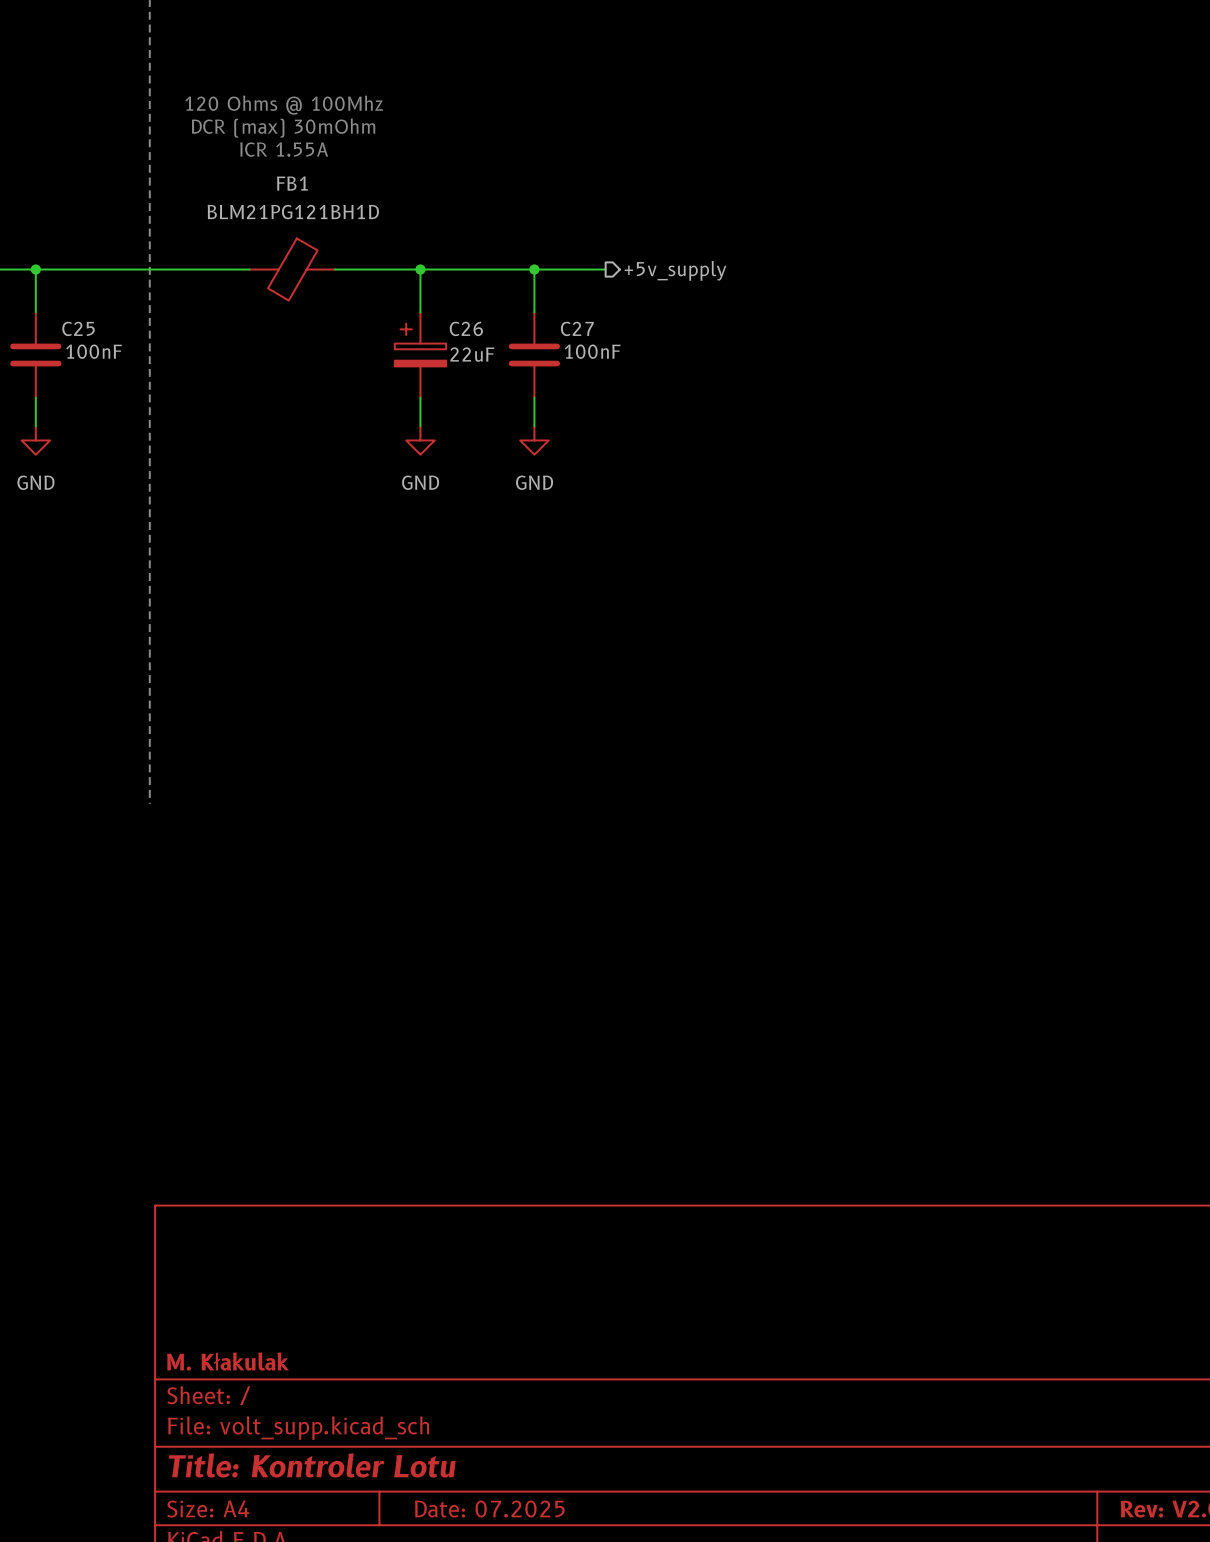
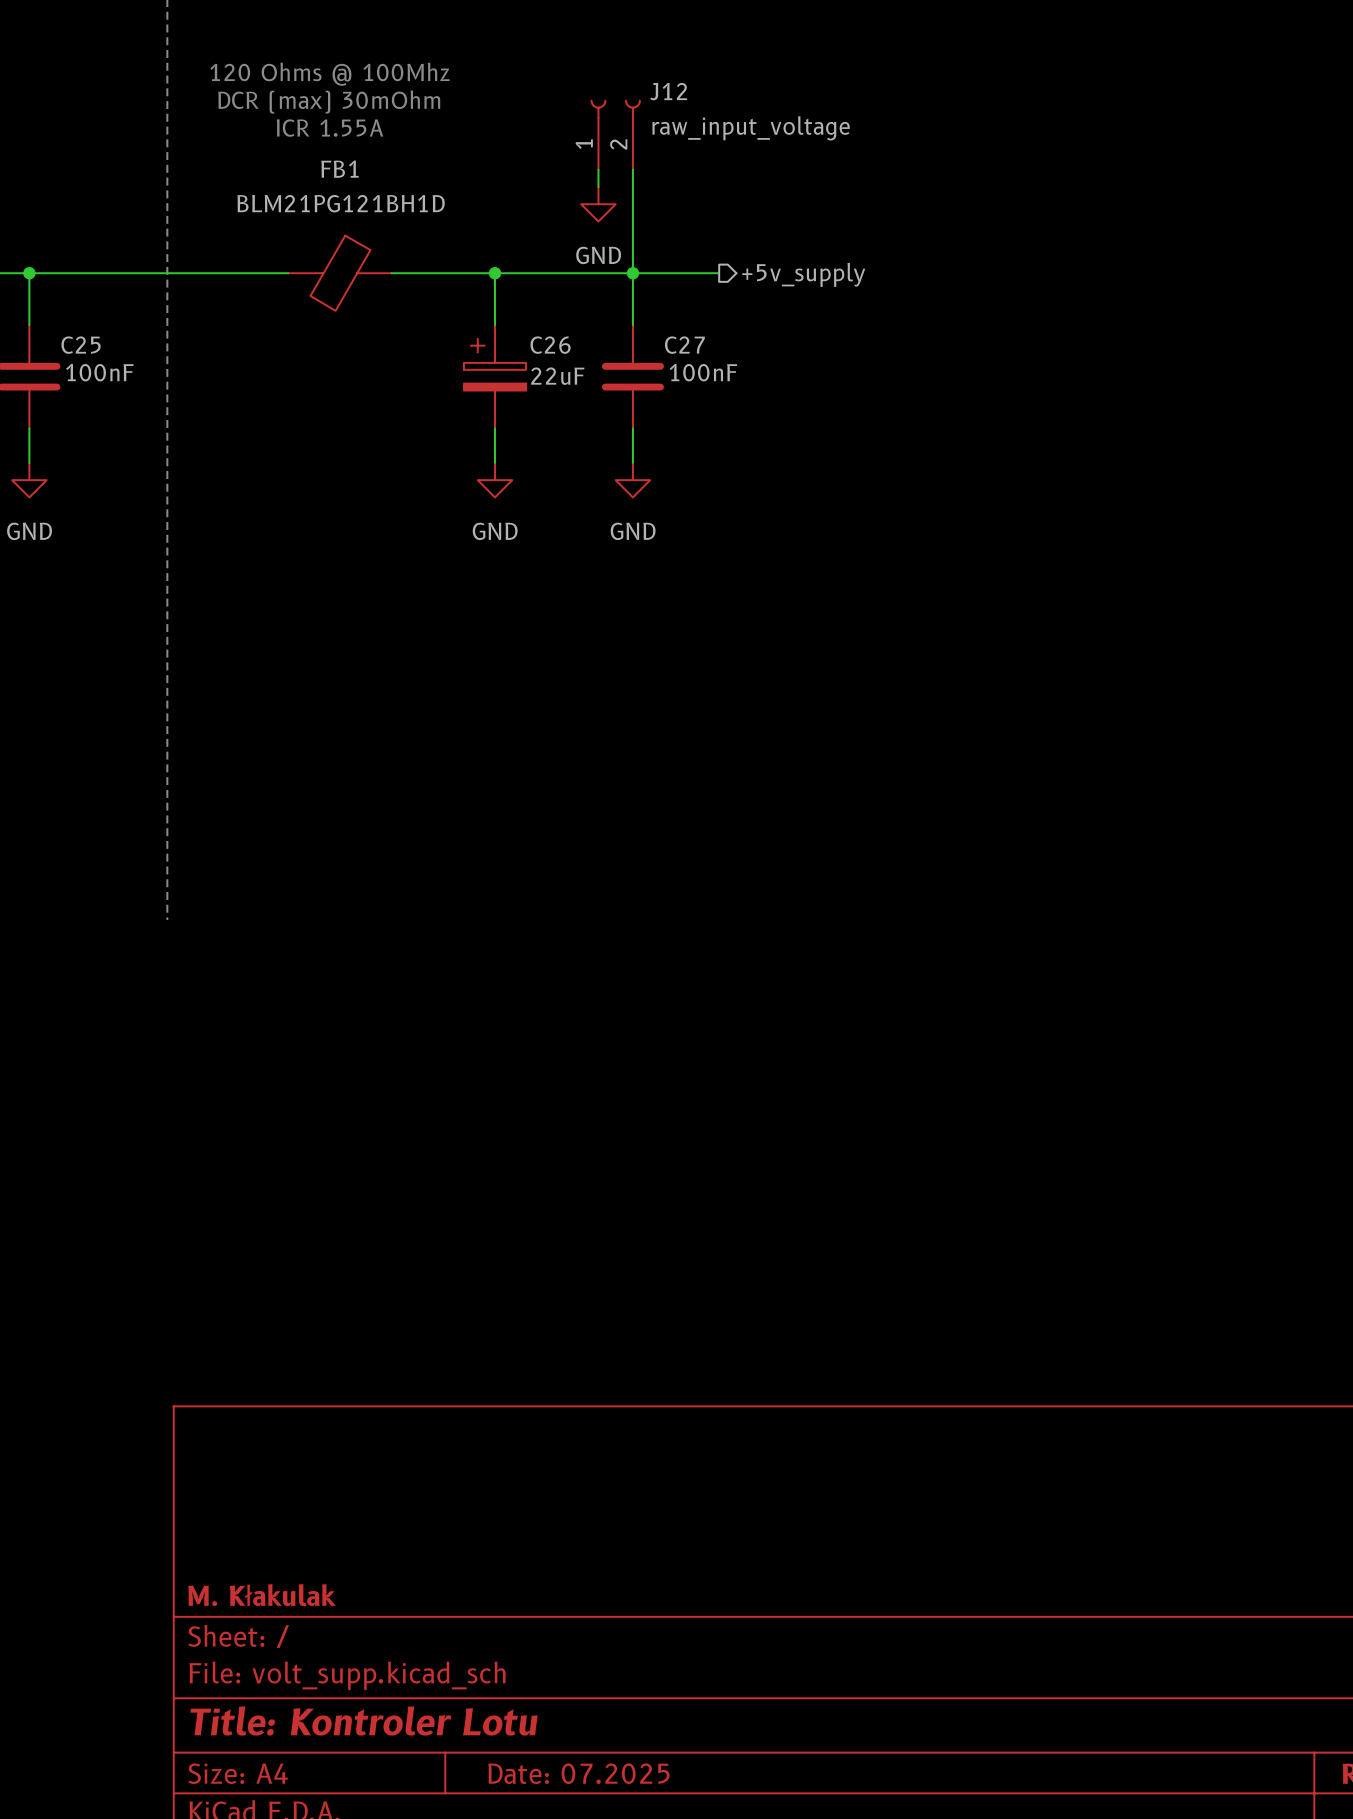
J12: none -> raw_input_voltage (615, 134)
wire: none -> (598, 169) (598, 187)
wire: none -> (632, 169) (632, 273)
power symbol: none -> GND (598, 204)

